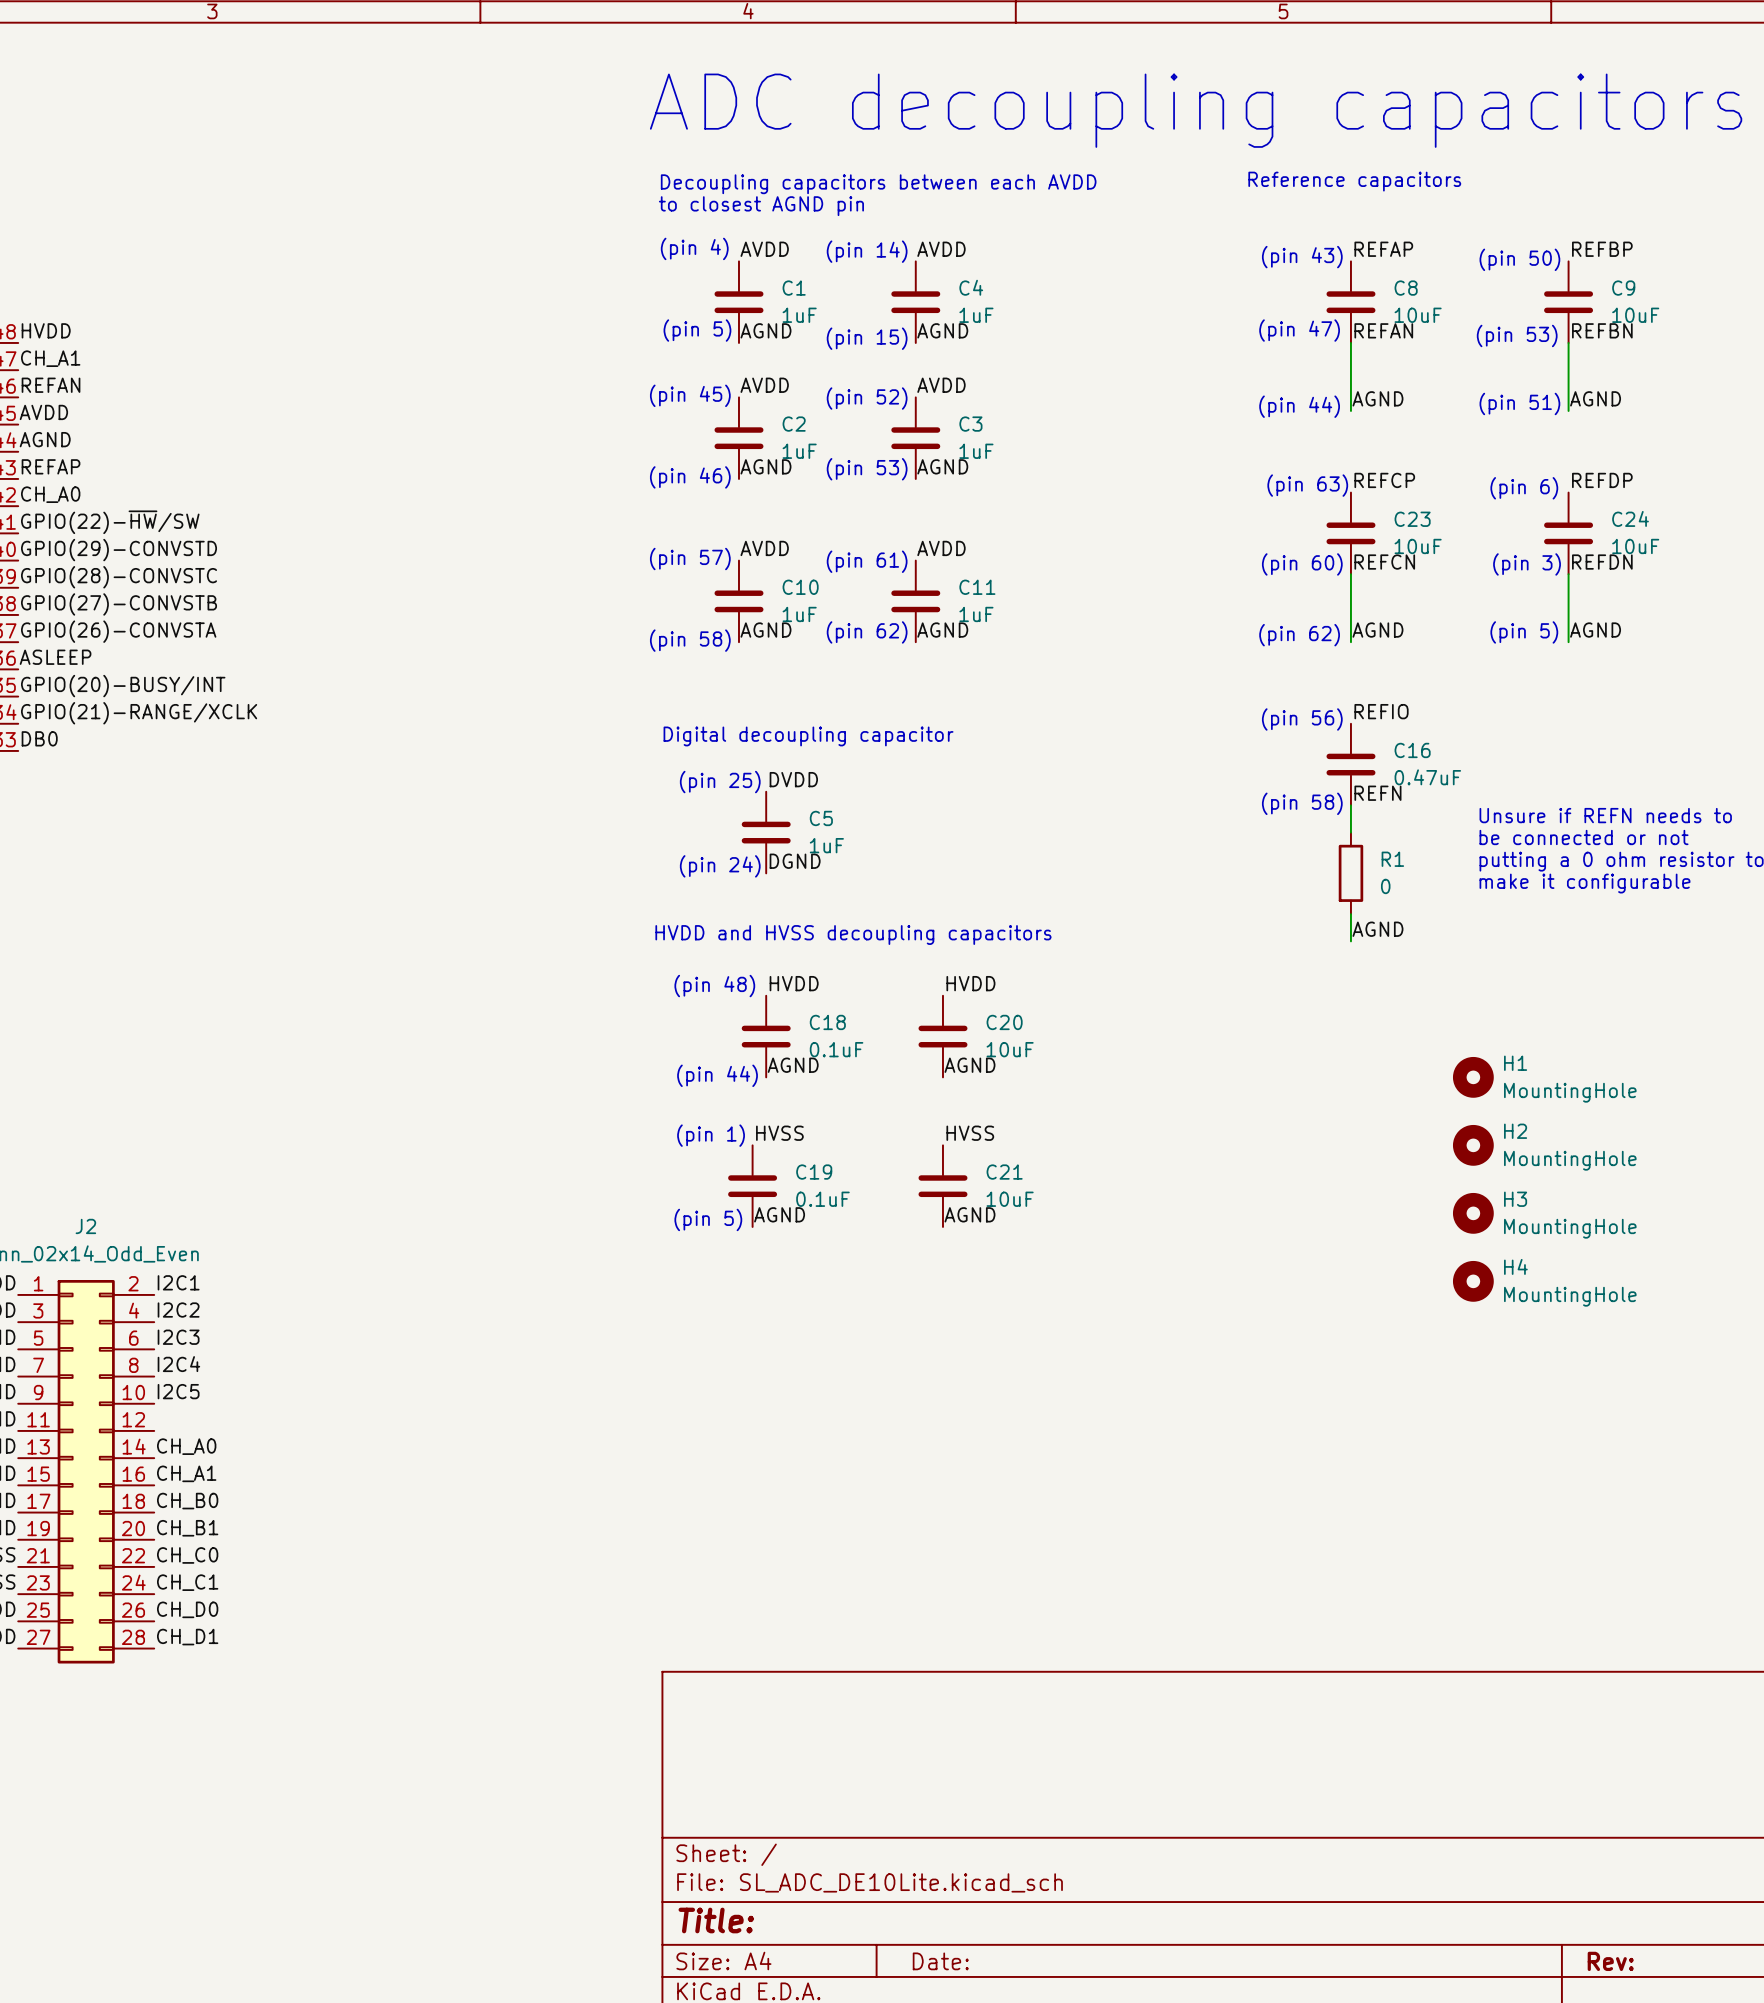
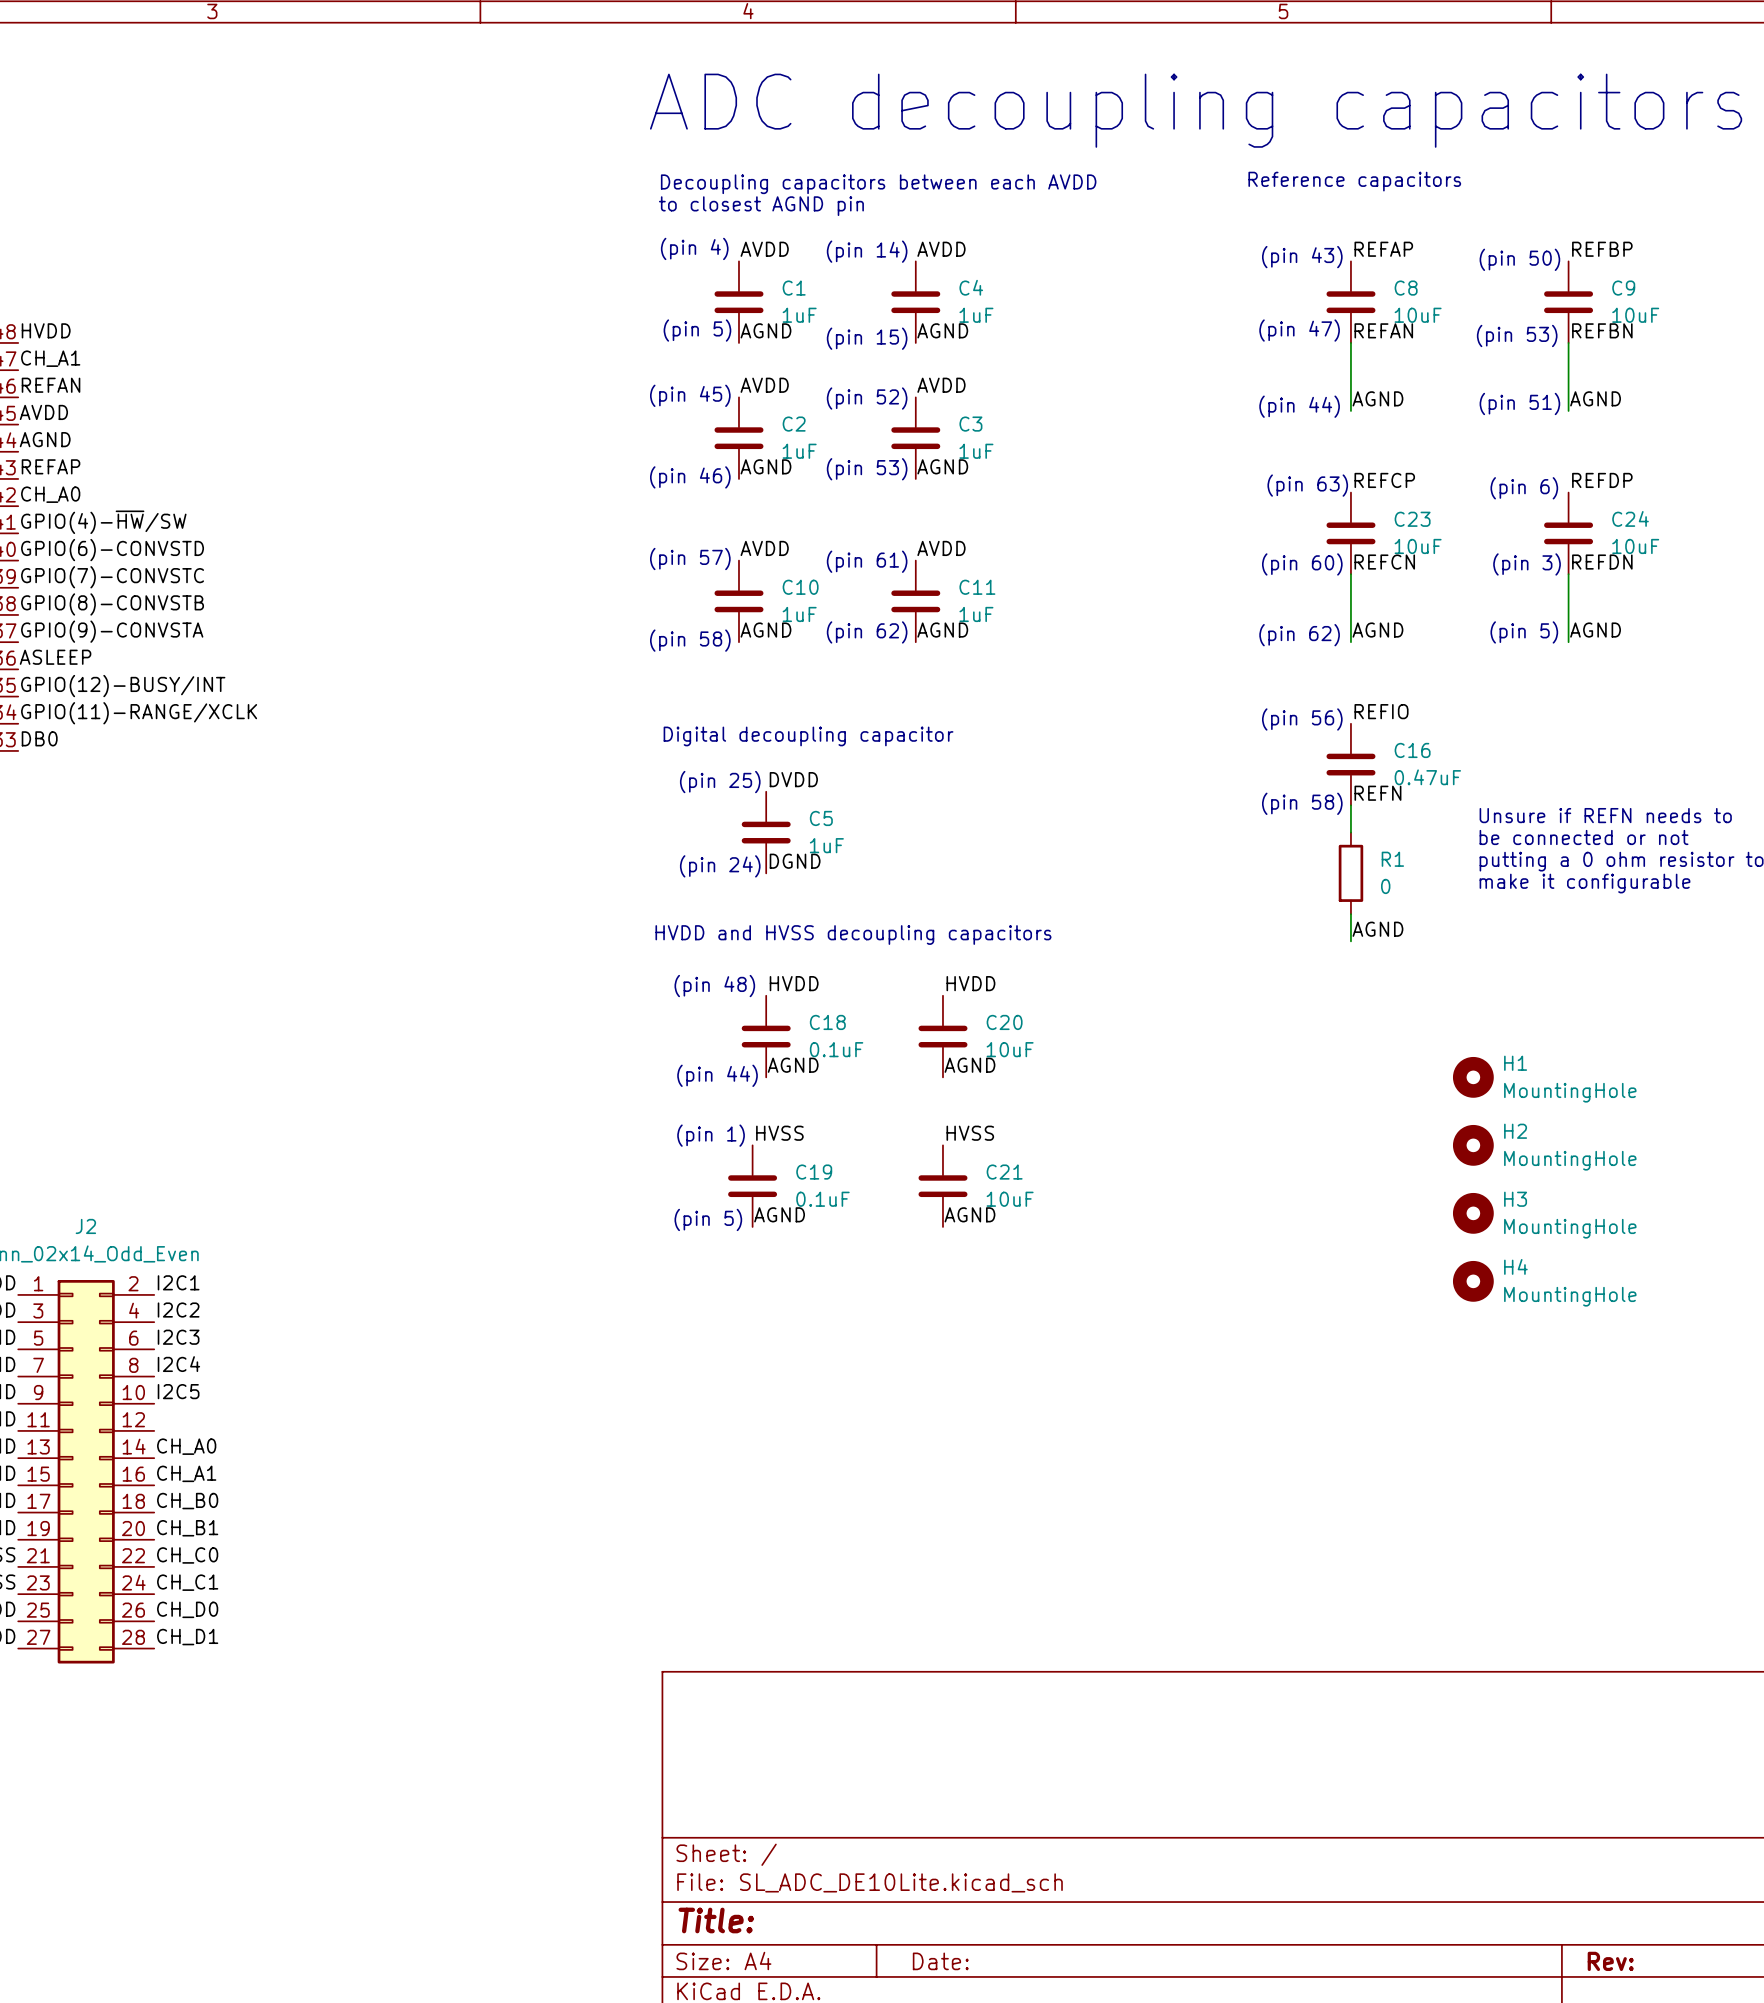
label: GPIO(22)-~{HW}/SW (110, 522) -> GPIO(4)-~{HW}/SW (103, 522)
label: GPIO(29)-CONVSTD (119, 550) -> GPIO(6)-CONVSTD (112, 550)
label: GPIO(28)-CONVSTC (119, 577) -> GPIO(7)-CONVSTC (112, 577)
label: GPIO(27)-CONVSTB (119, 604) -> GPIO(8)-CONVSTB (112, 604)
label: GPIO(26)-CONVSTA (118, 631) -> GPIO(9)-CONVSTA (112, 631)
label: GPIO(20)-BUSY/INT (123, 686) -> GPIO(12)-BUSY/INT (123, 686)
label: GPIO(21)-RANGE/XCLK (139, 713) -> GPIO(11)-RANGE/XCLK (139, 713)

